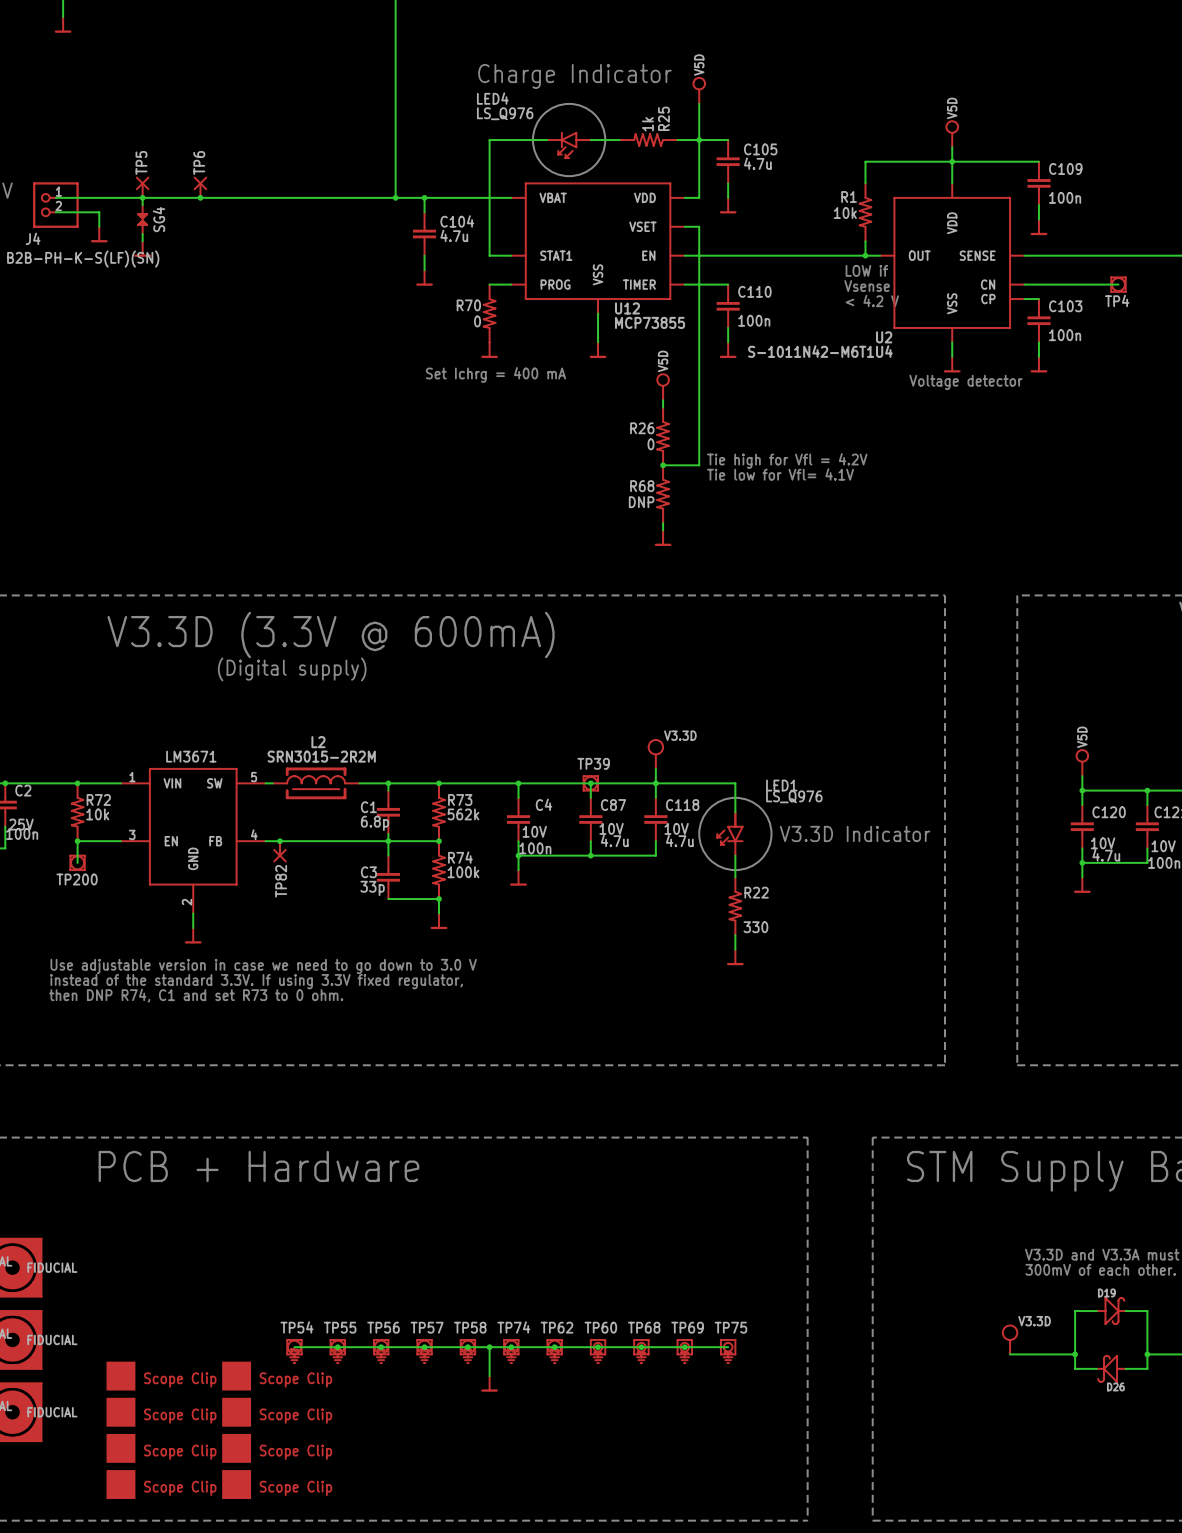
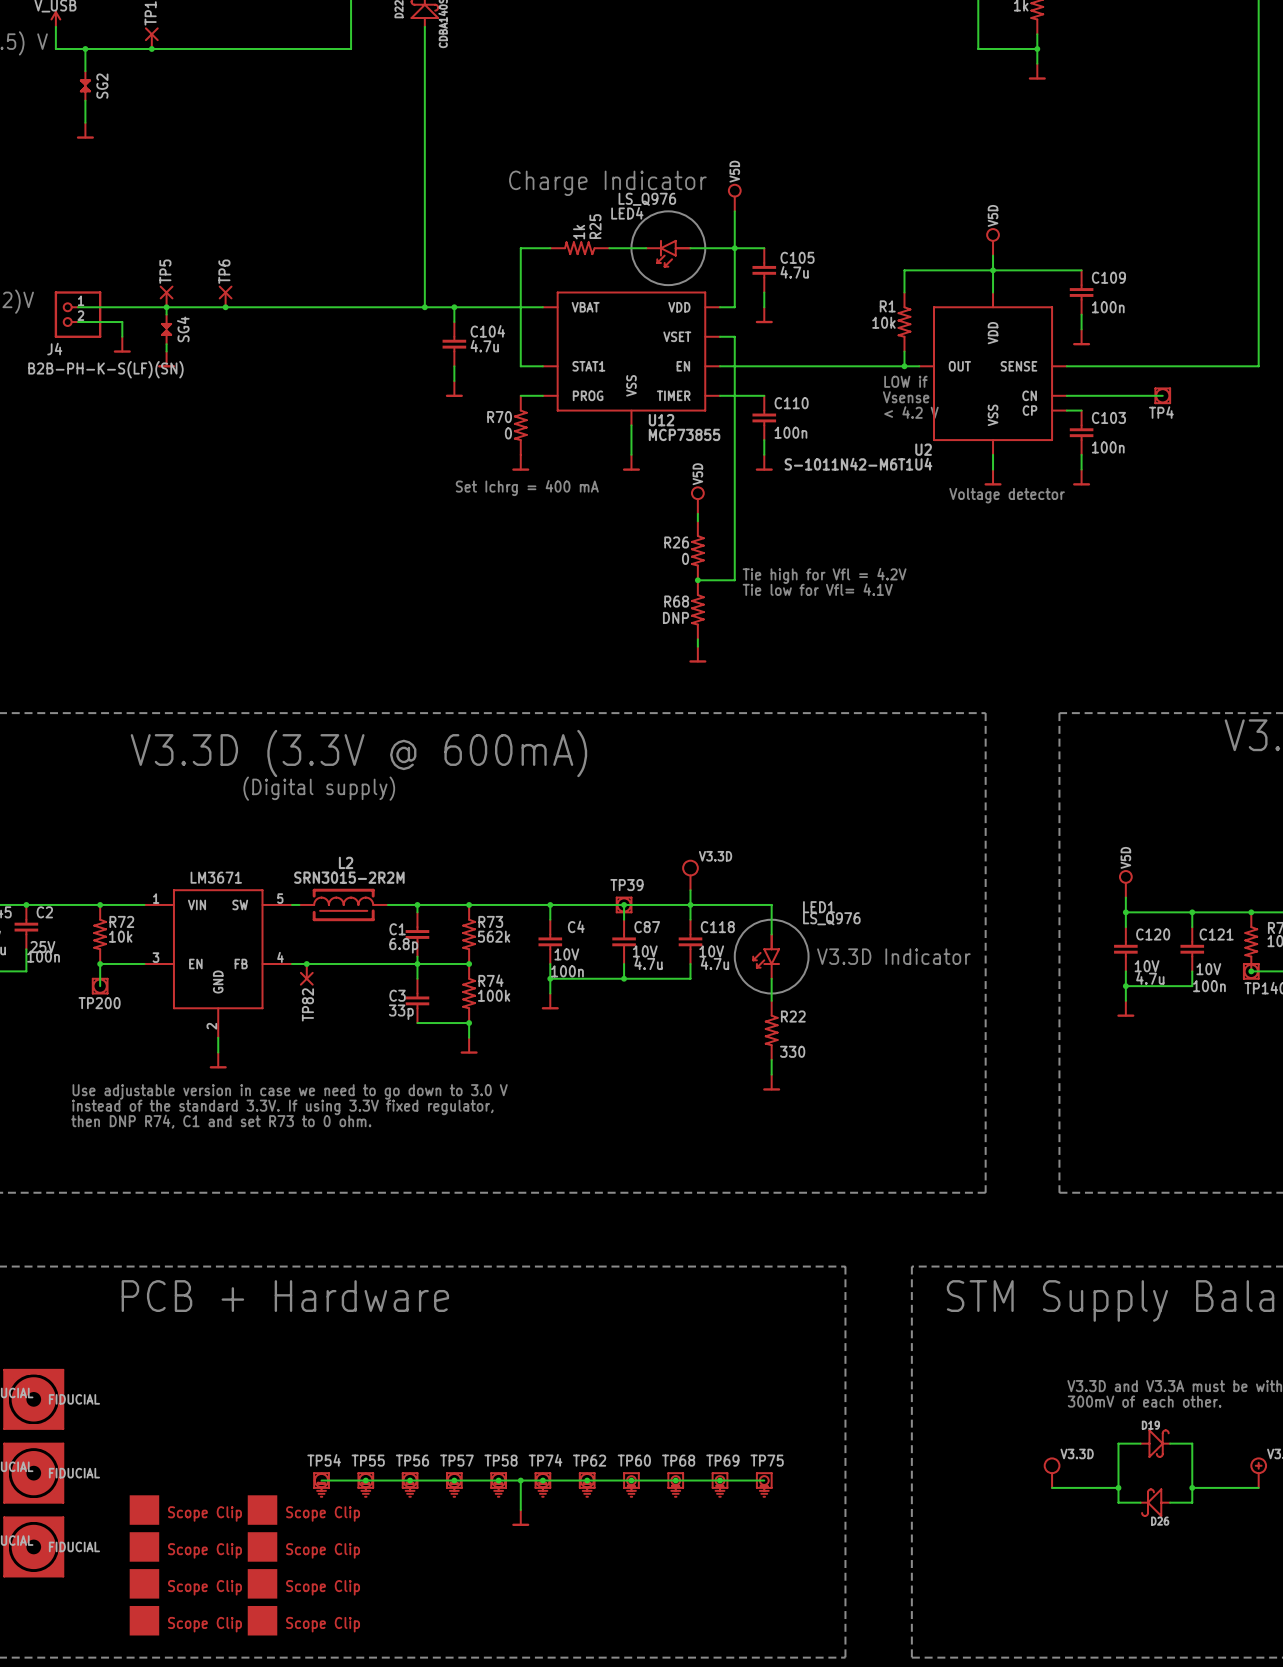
LED4 name position: LED4 (492, 98) -> LED4 (627, 213)
LED4 value position: LS_Q976 (505, 113) -> LS_Q976 (647, 199)
drawing position: (569, 140) -> (668, 248)
R25 position: (648, 140) -> (579, 248)
LED4 position: (569, 145) -> (668, 253)

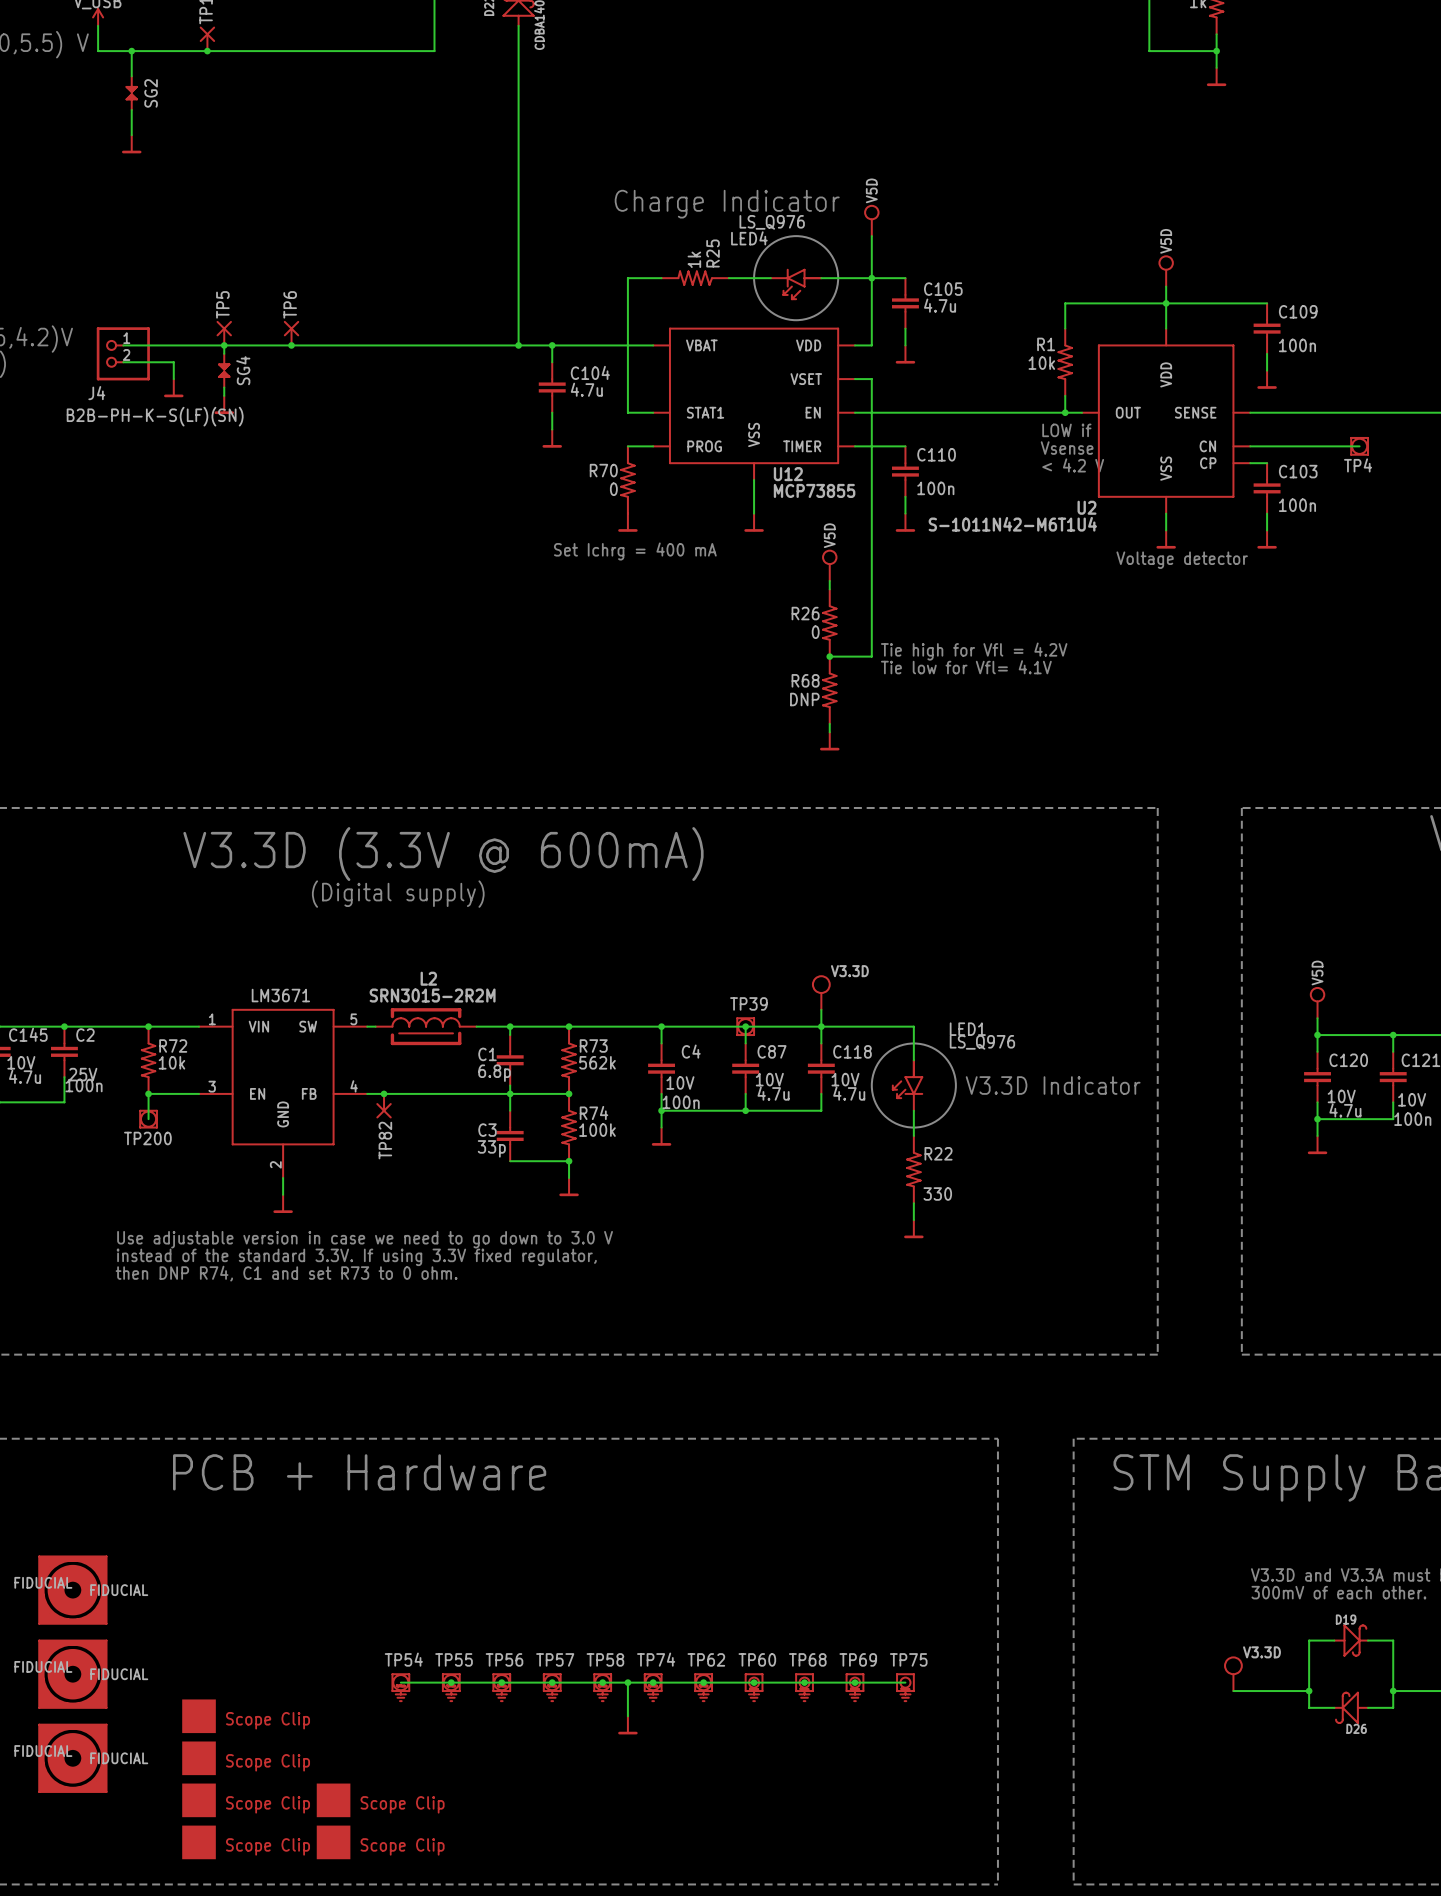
part: (262, 1510) -> none
part: (262, 1546) -> none

